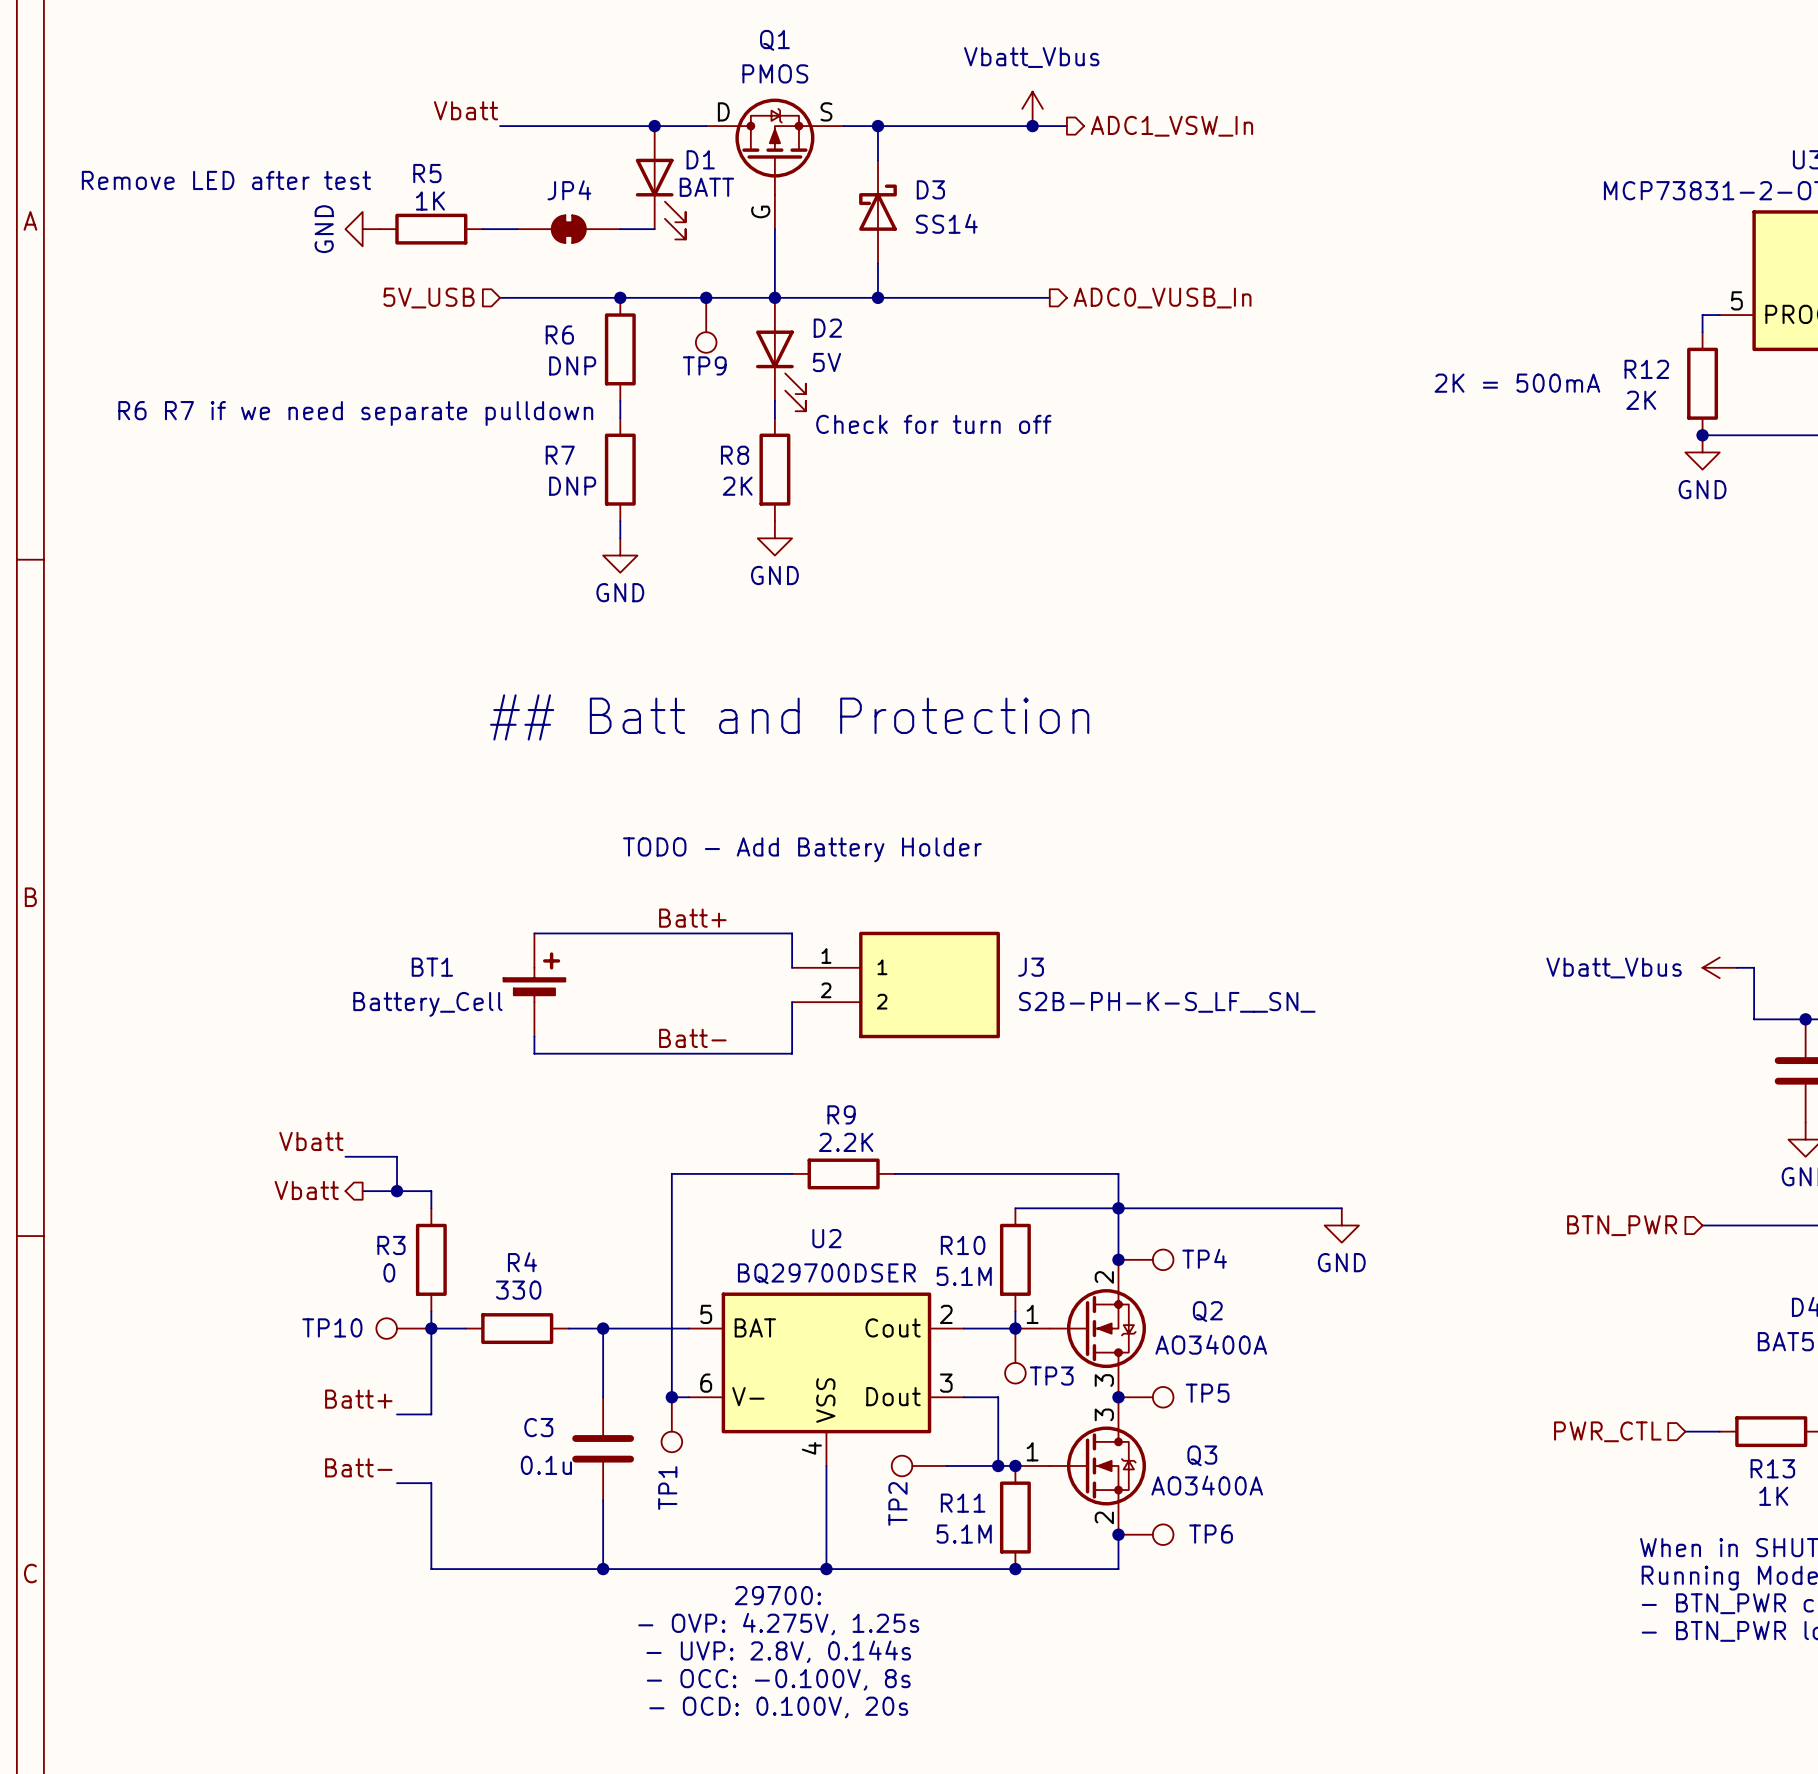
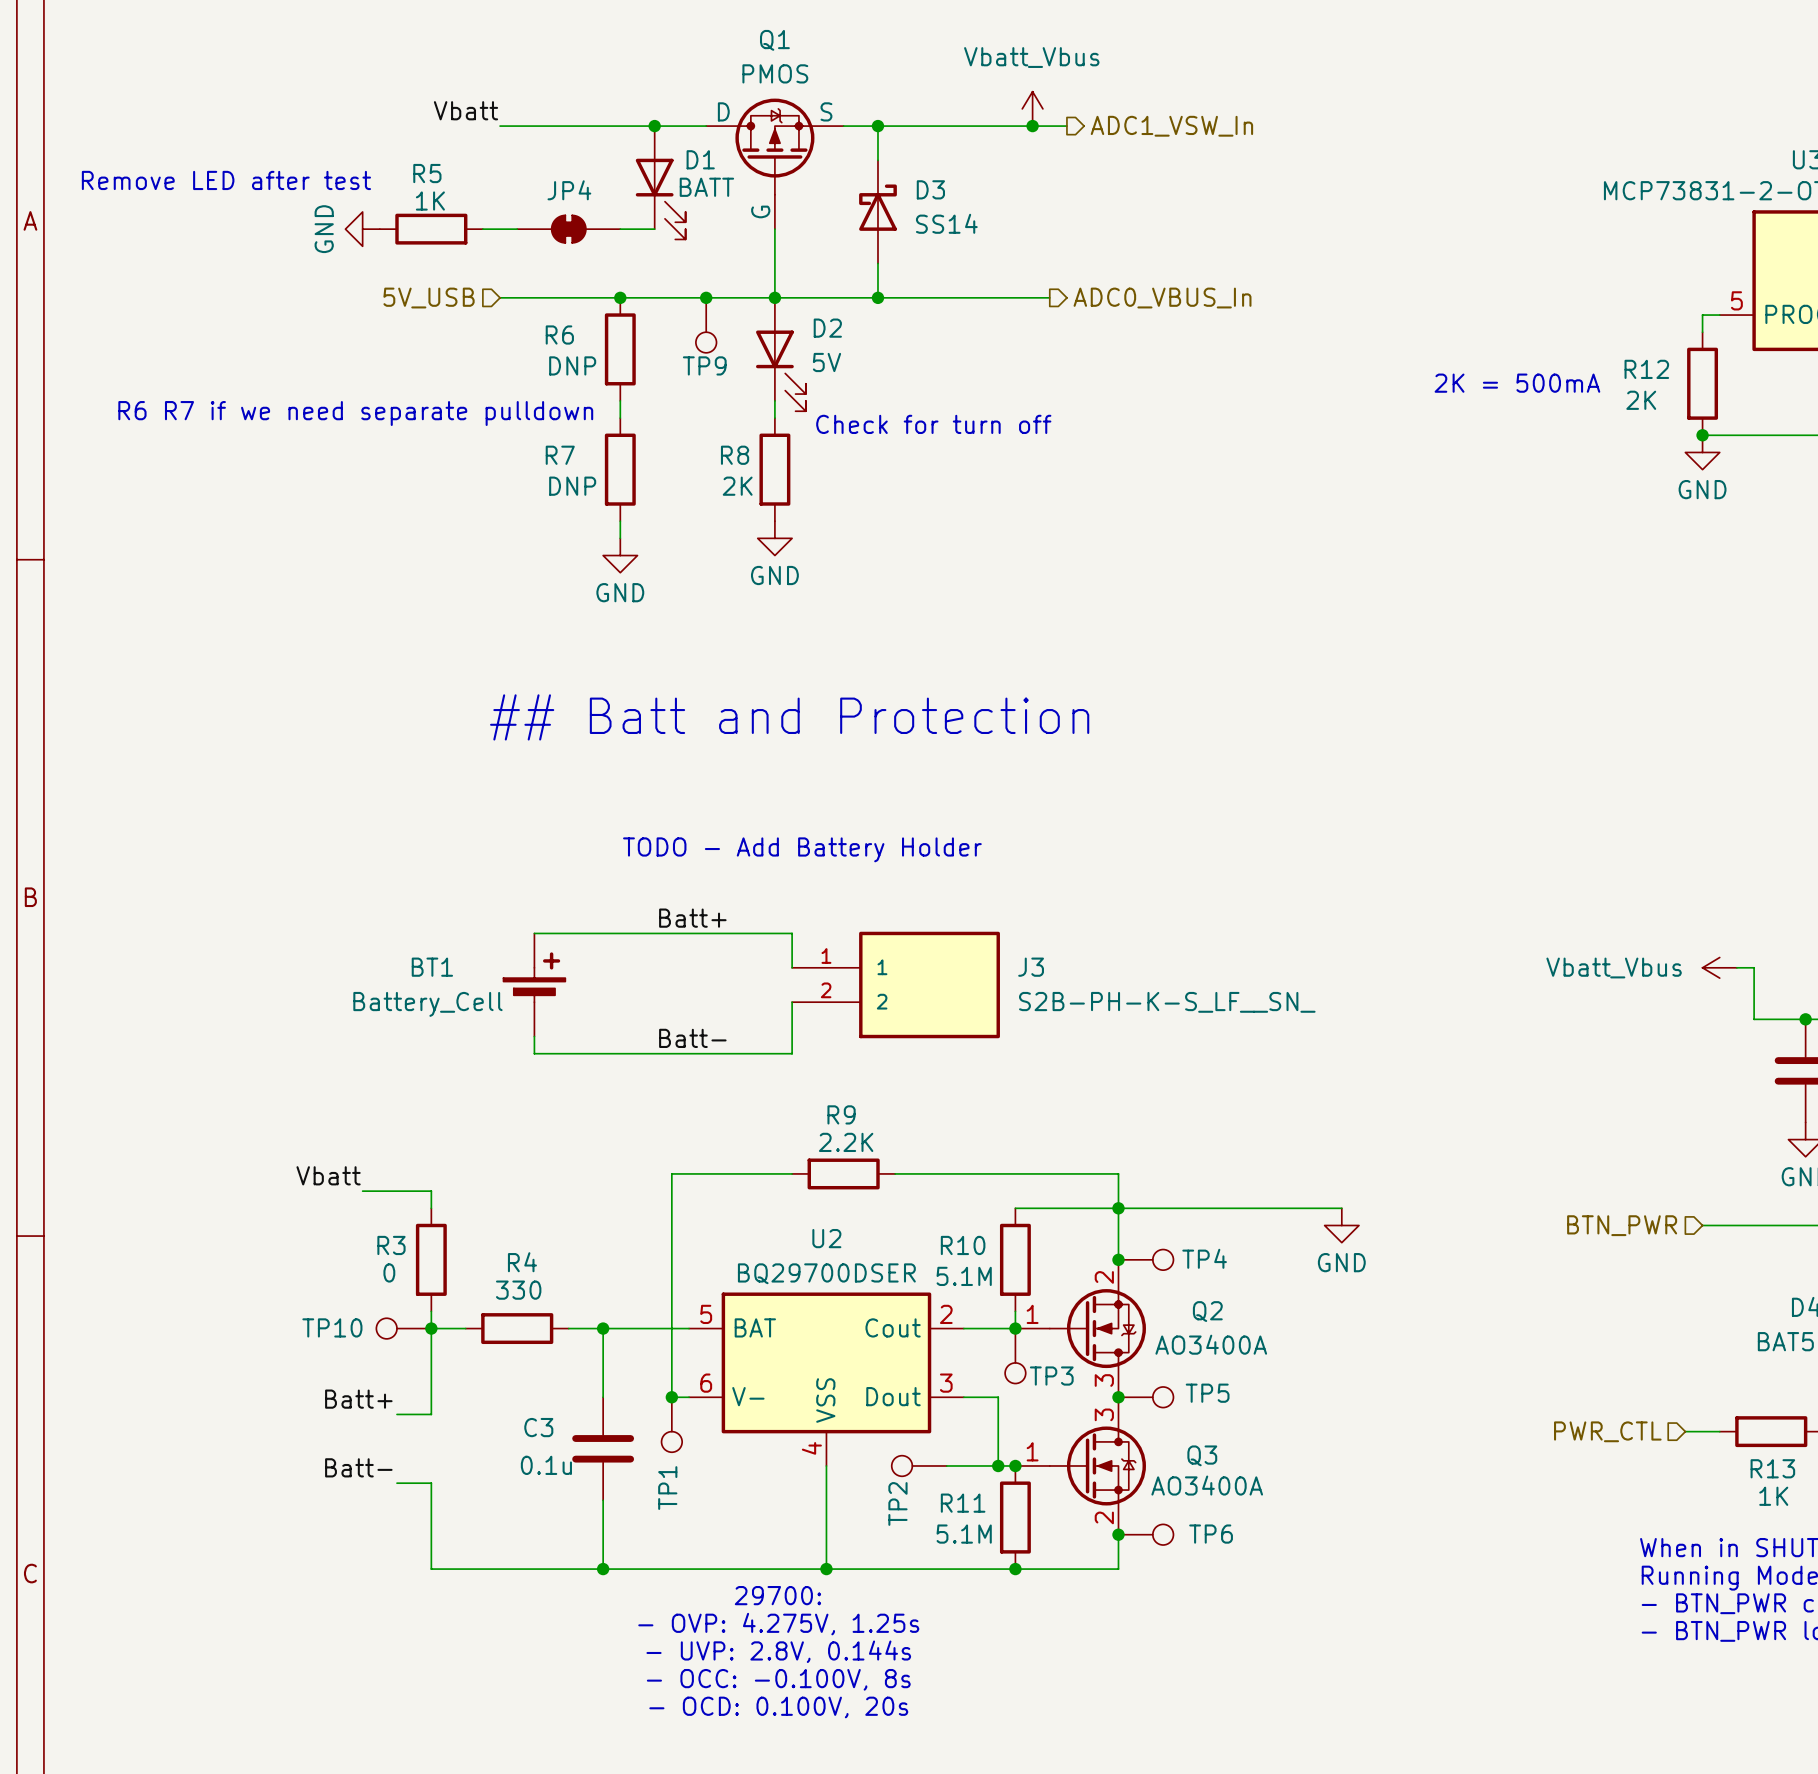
hierarchical label: ADC0_VUSB_In (1162, 298) -> ADC0_VBUS_In (1162, 298)
label position: Vbatt (311, 1141) -> Vbatt (328, 1175)
wire: (345, 1156) (396, 1156) (396, 1191) -> none
hierarchical label: Vbatt (306, 1190) -> none
junction: (396, 1191) -> none

